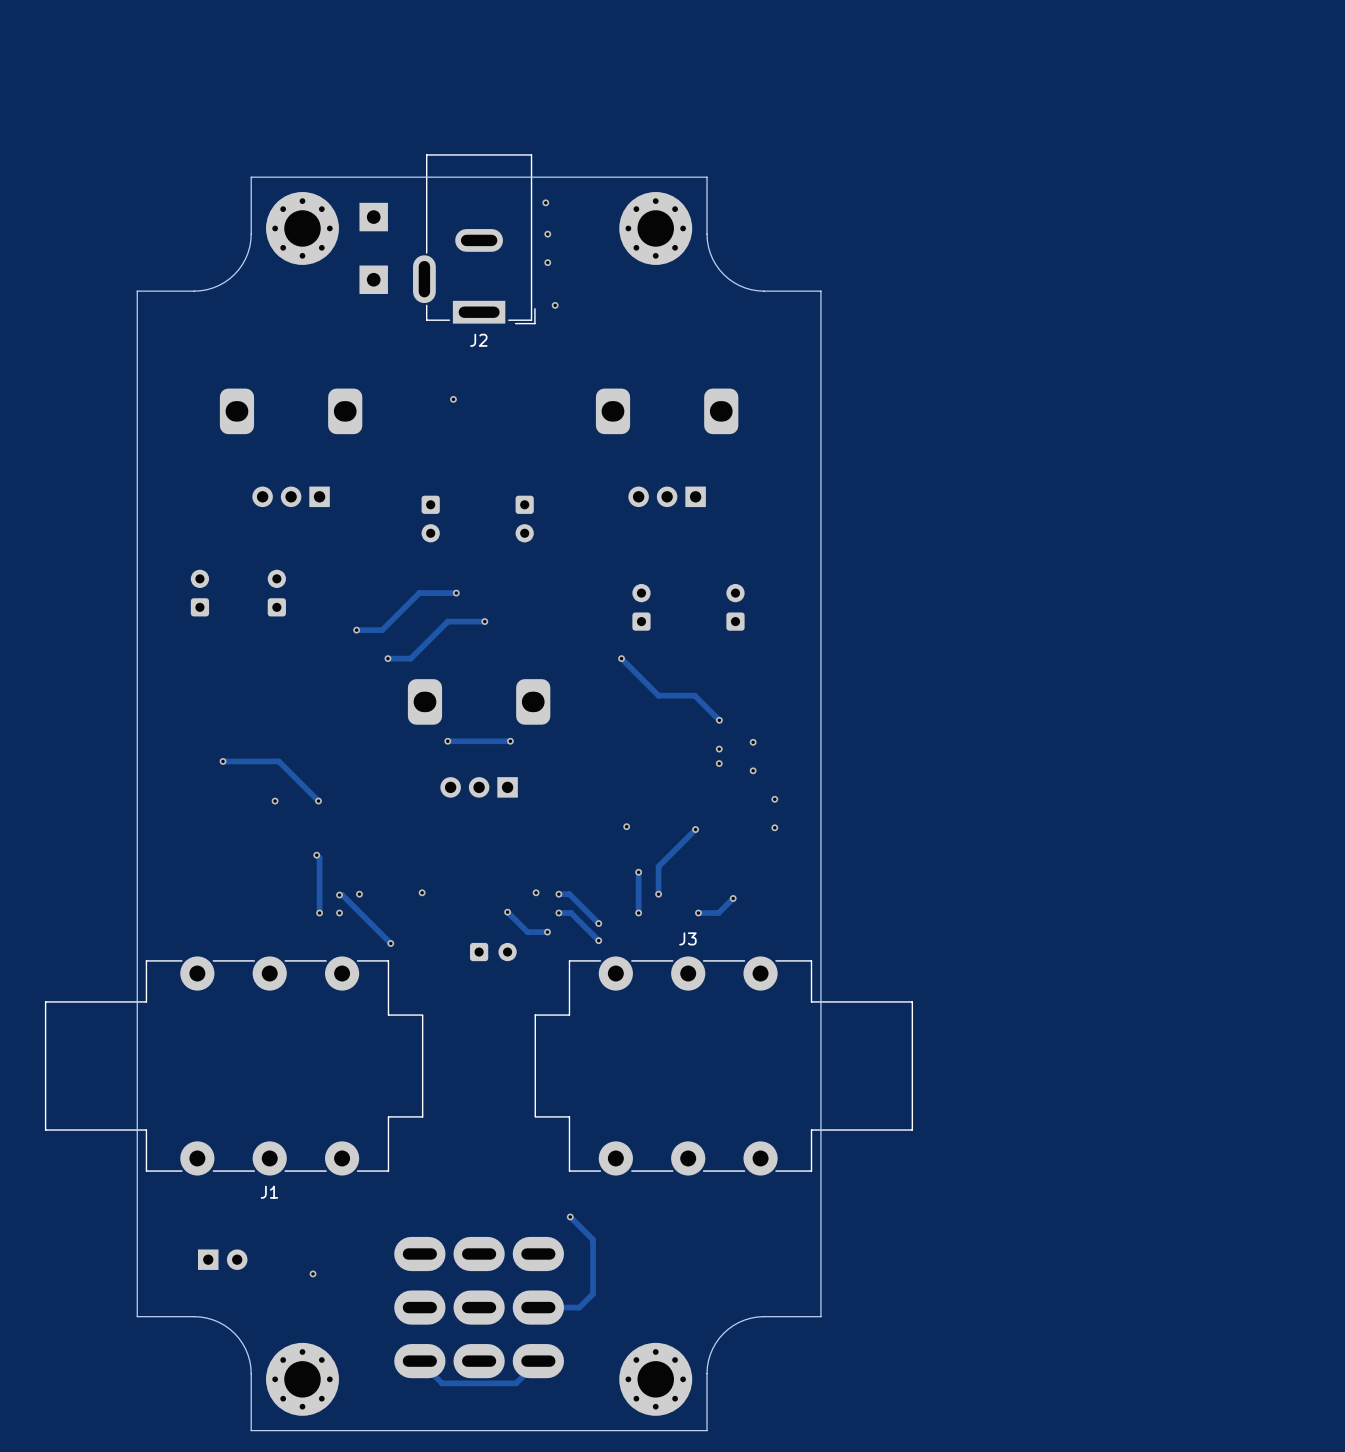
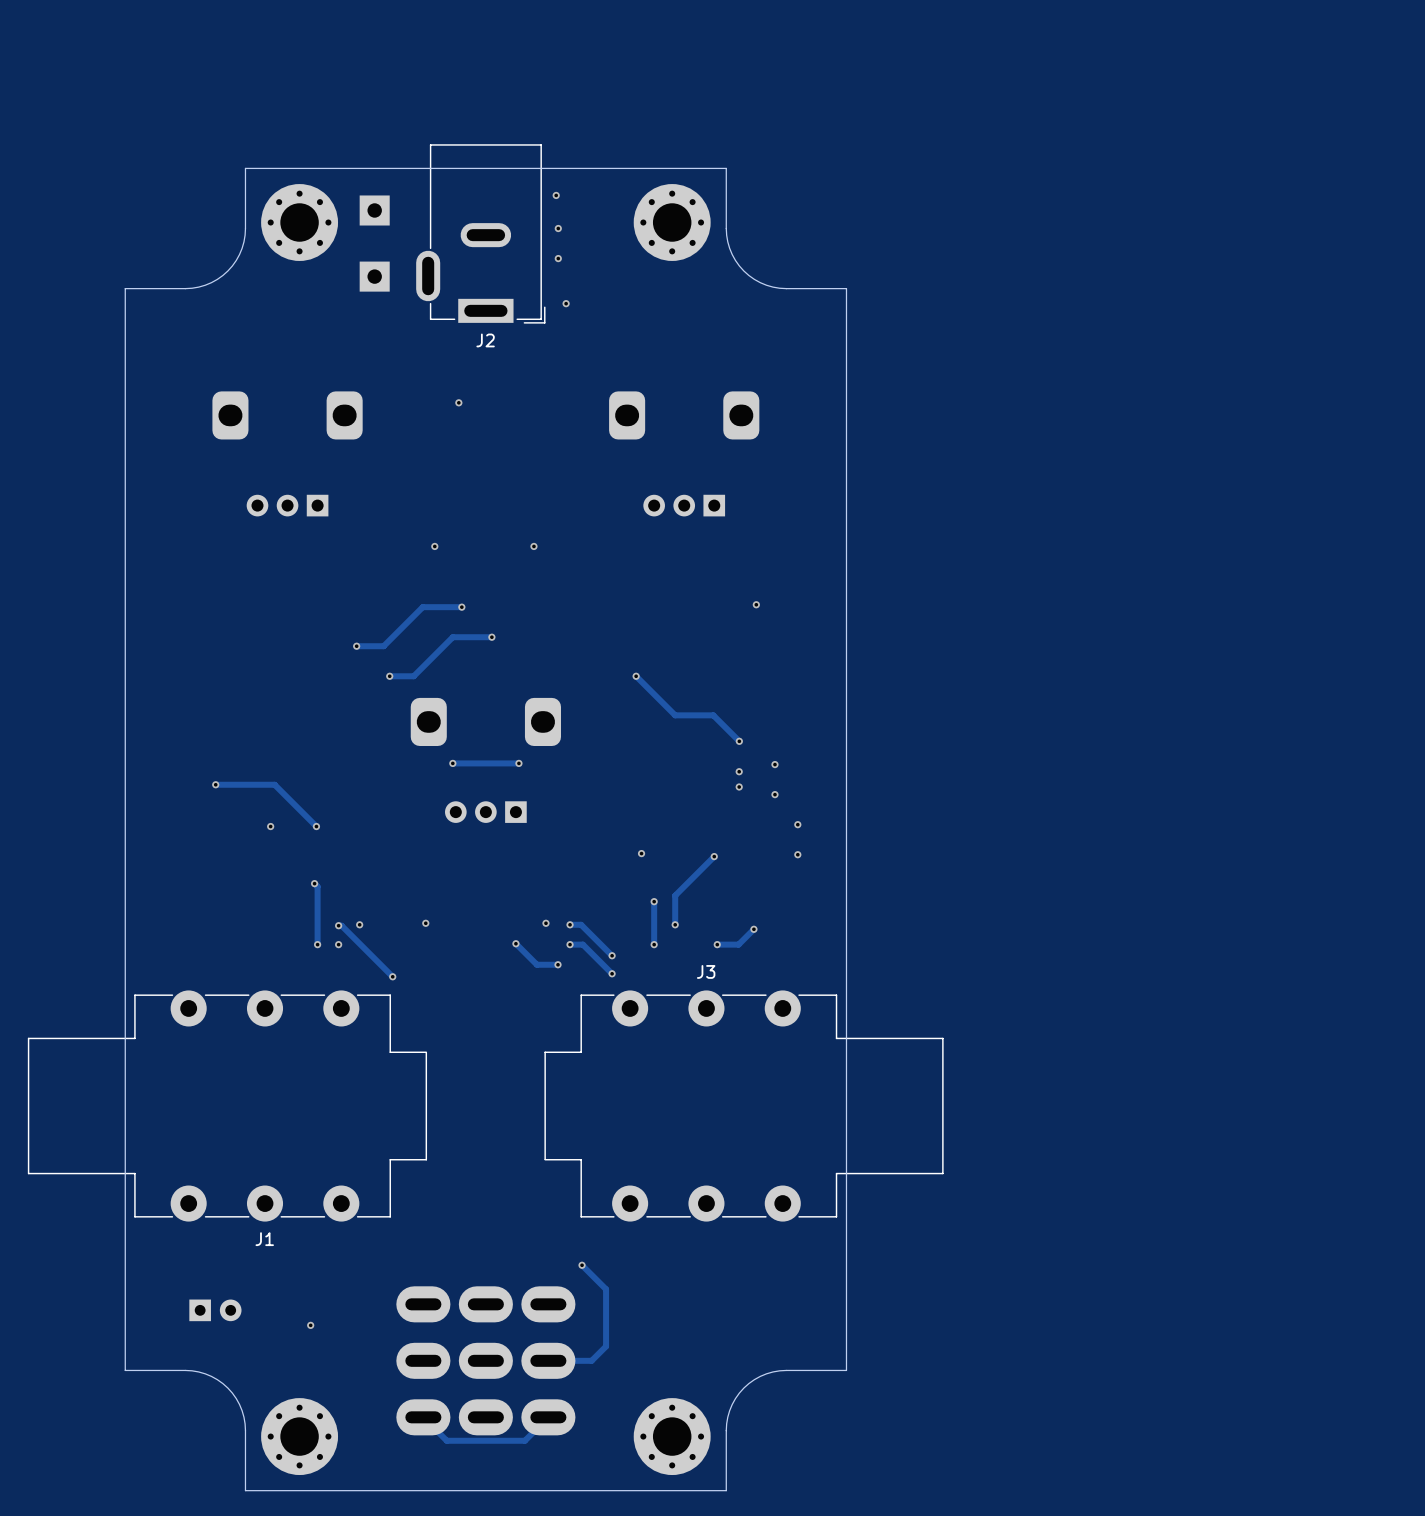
part: (430, 519) -> none
part: (524, 519) -> none
via: none -> (434, 546)
via: none -> (533, 546)
via: none -> (756, 604)
part: (199, 593) -> none
part: (276, 593) -> none
part: (641, 607) -> none
part: (735, 607) -> none
part: (493, 952) -> none

